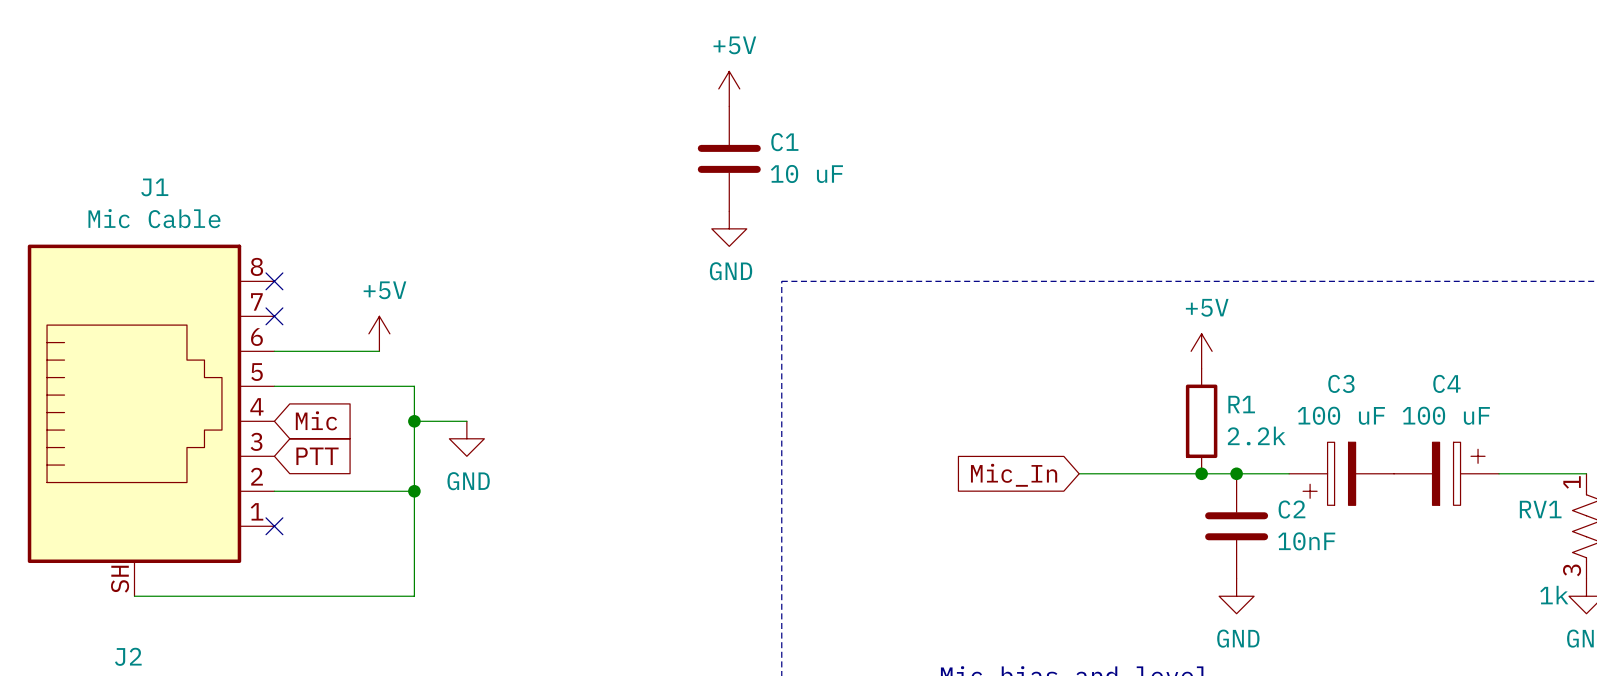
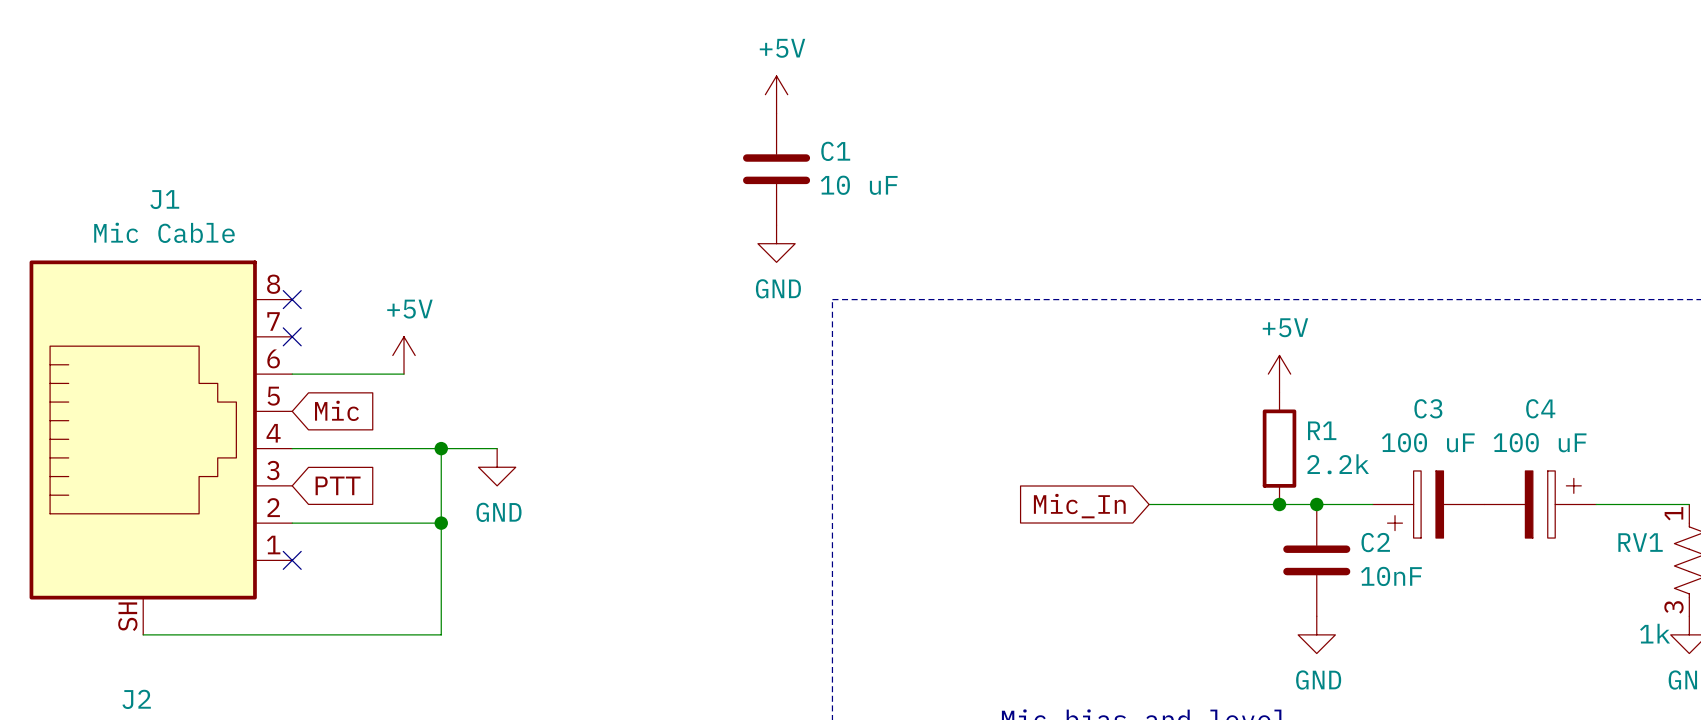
wire: (274, 386) (414, 386) (414, 421) -> (292, 448) (441, 448)
global label position: Mic (316, 420) -> Mic (336, 410)

